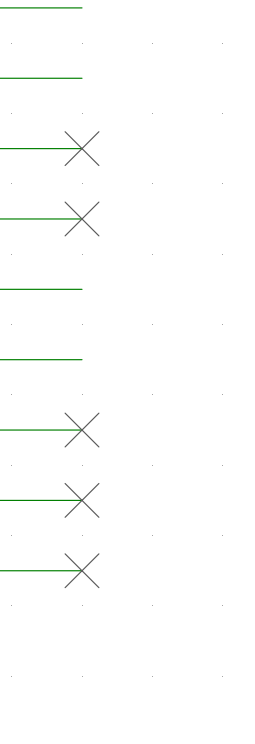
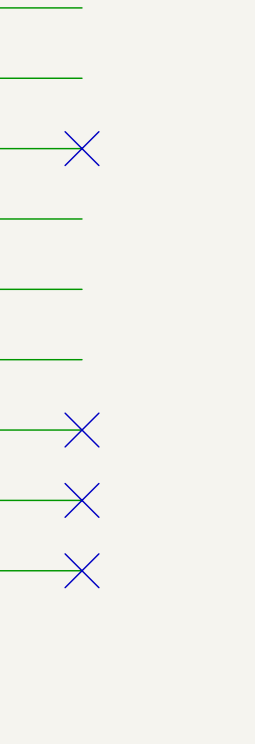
no-connect mark: (82, 218) -> none

